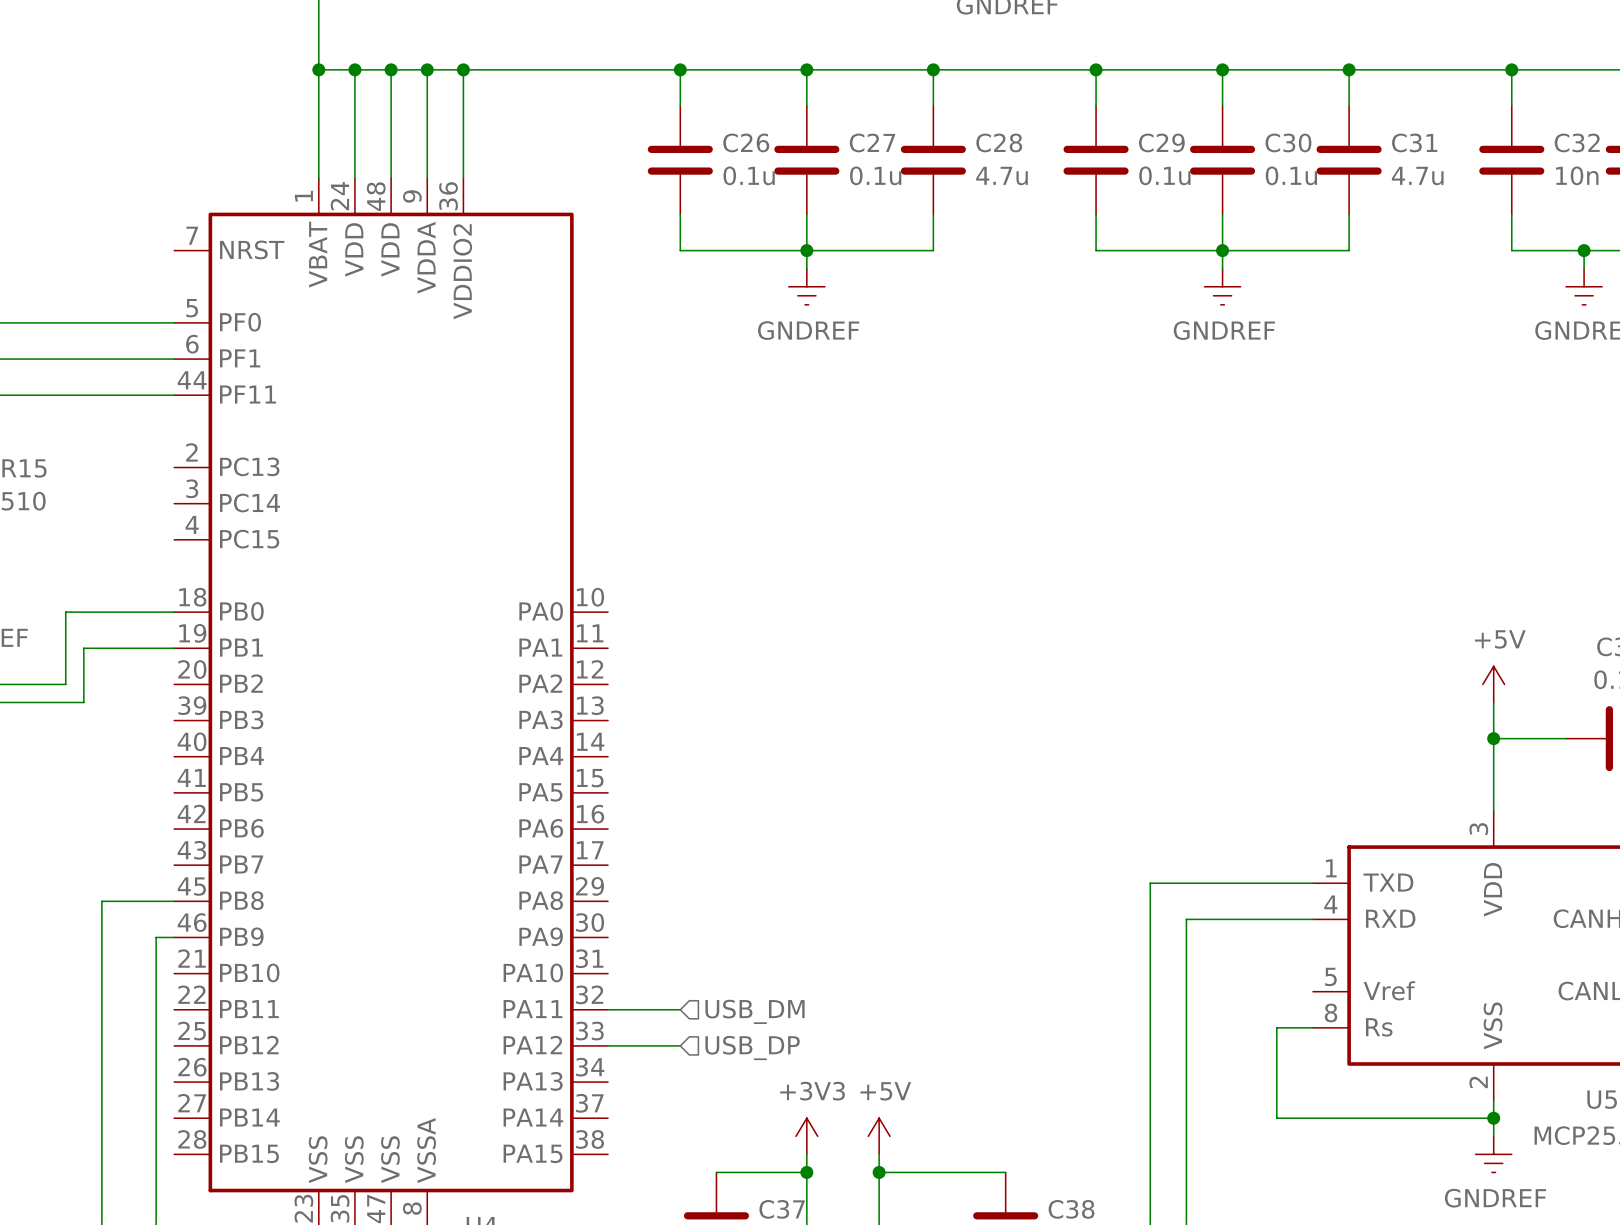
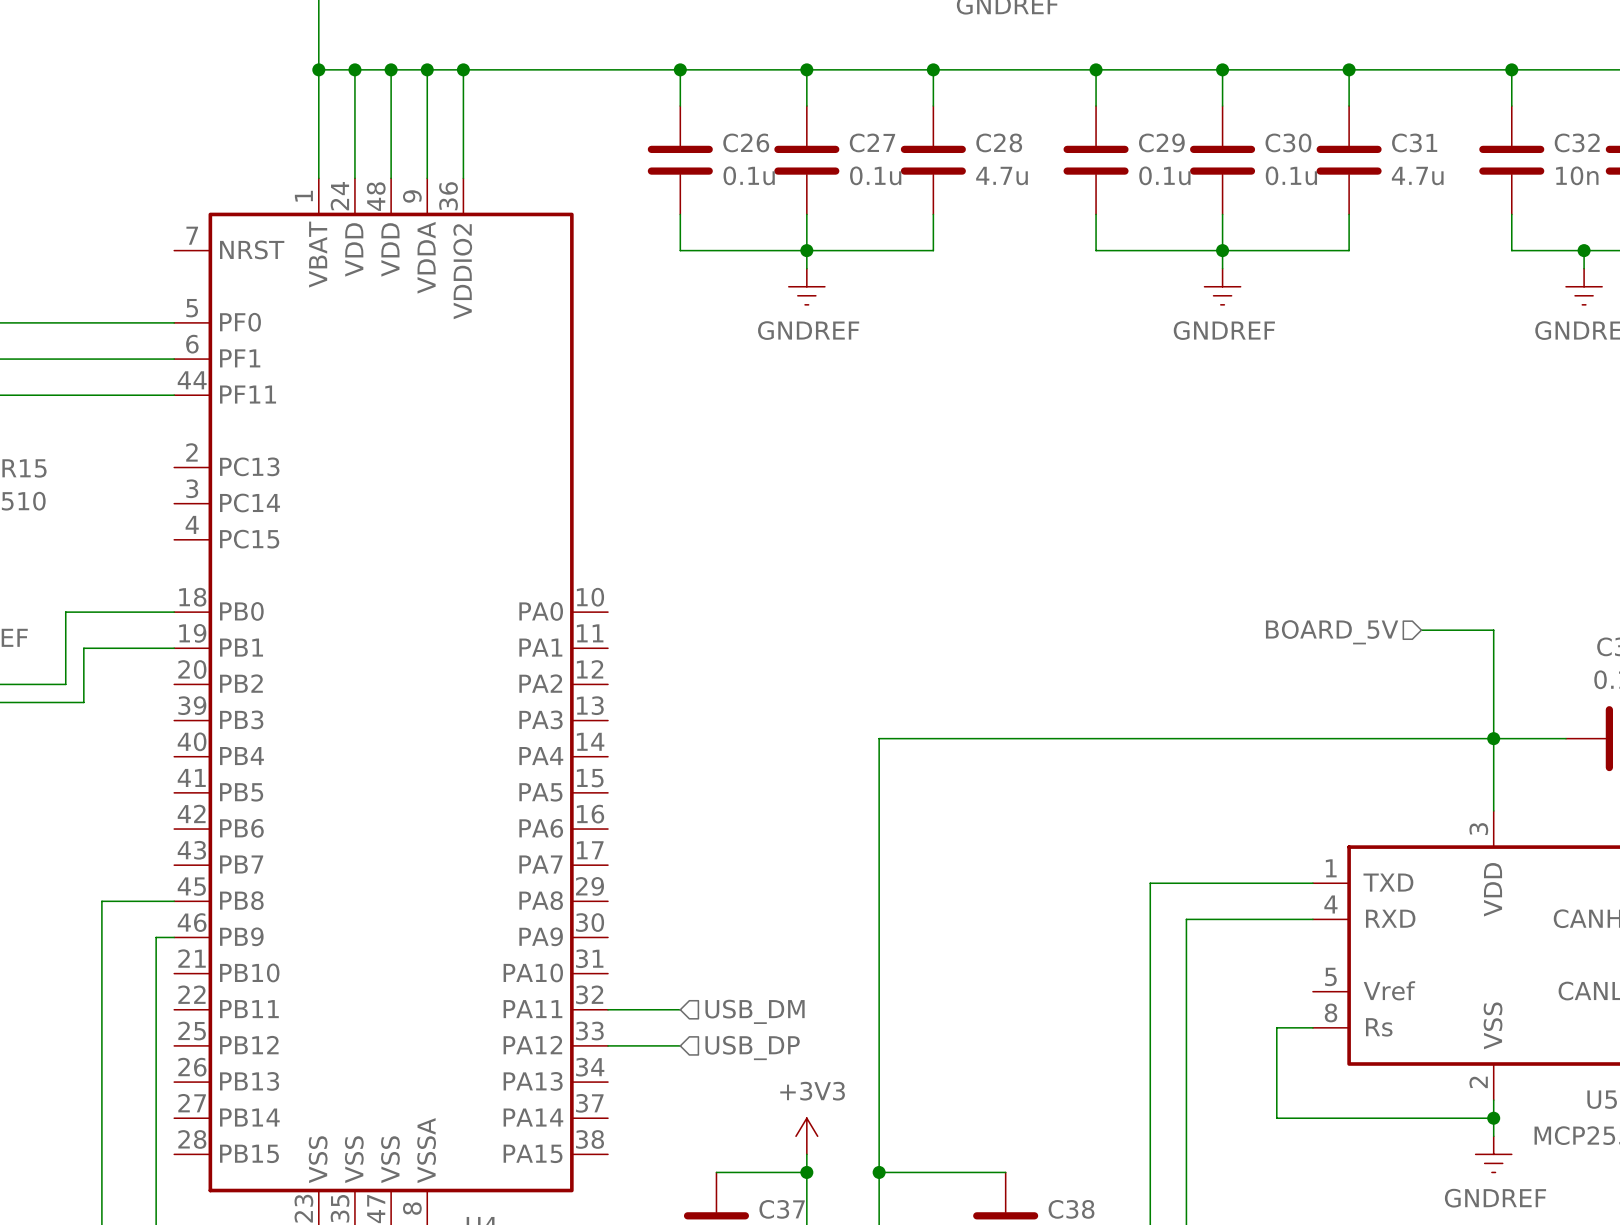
wire: none -> (1421, 630) (1493, 630) (1493, 702)
hierarchical label: none -> BOARD_5V (1332, 632)
power symbol: +5V (1493, 684) -> none
wire: none -> (1493, 738) (879, 738) (879, 1154)
power symbol: +5V (879, 1136) -> none

